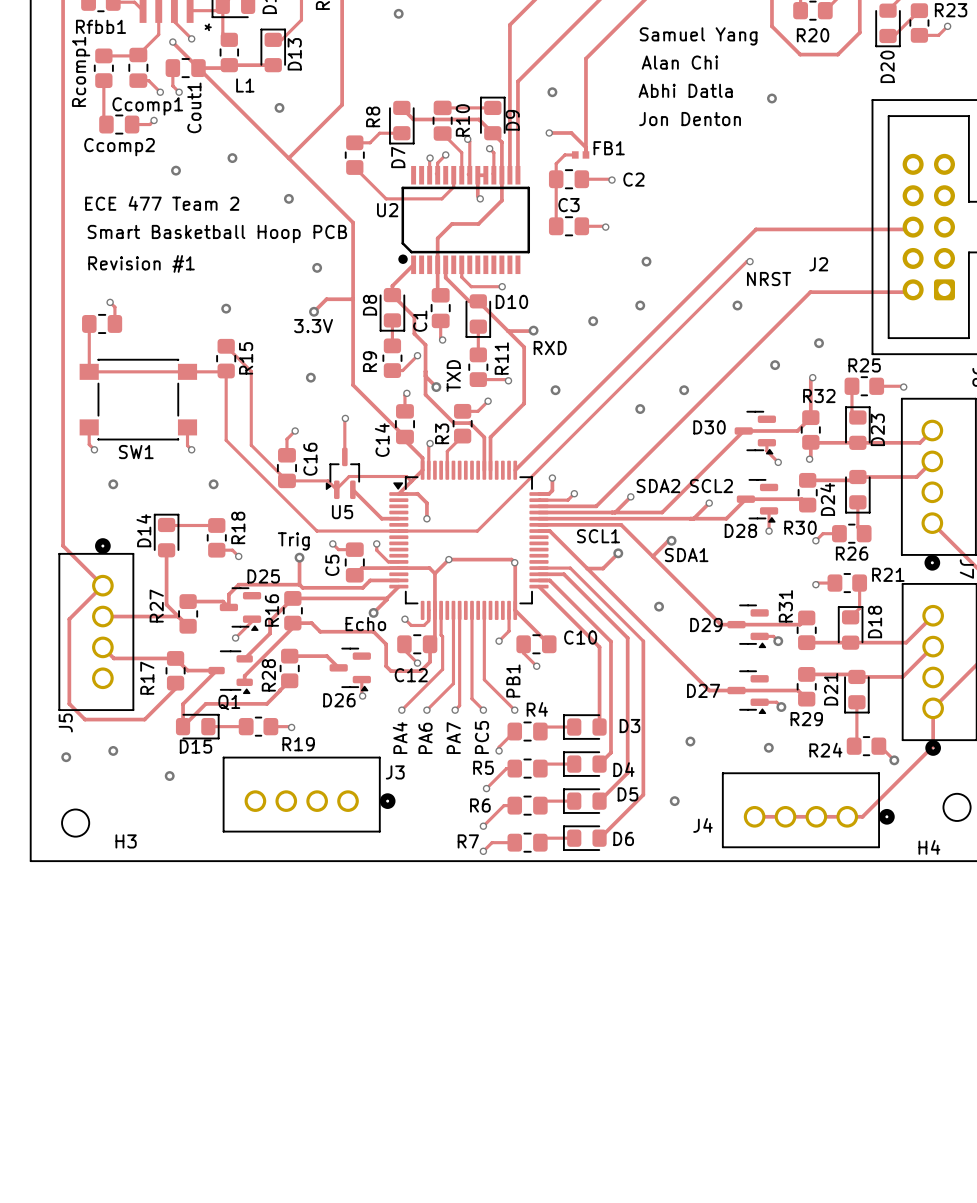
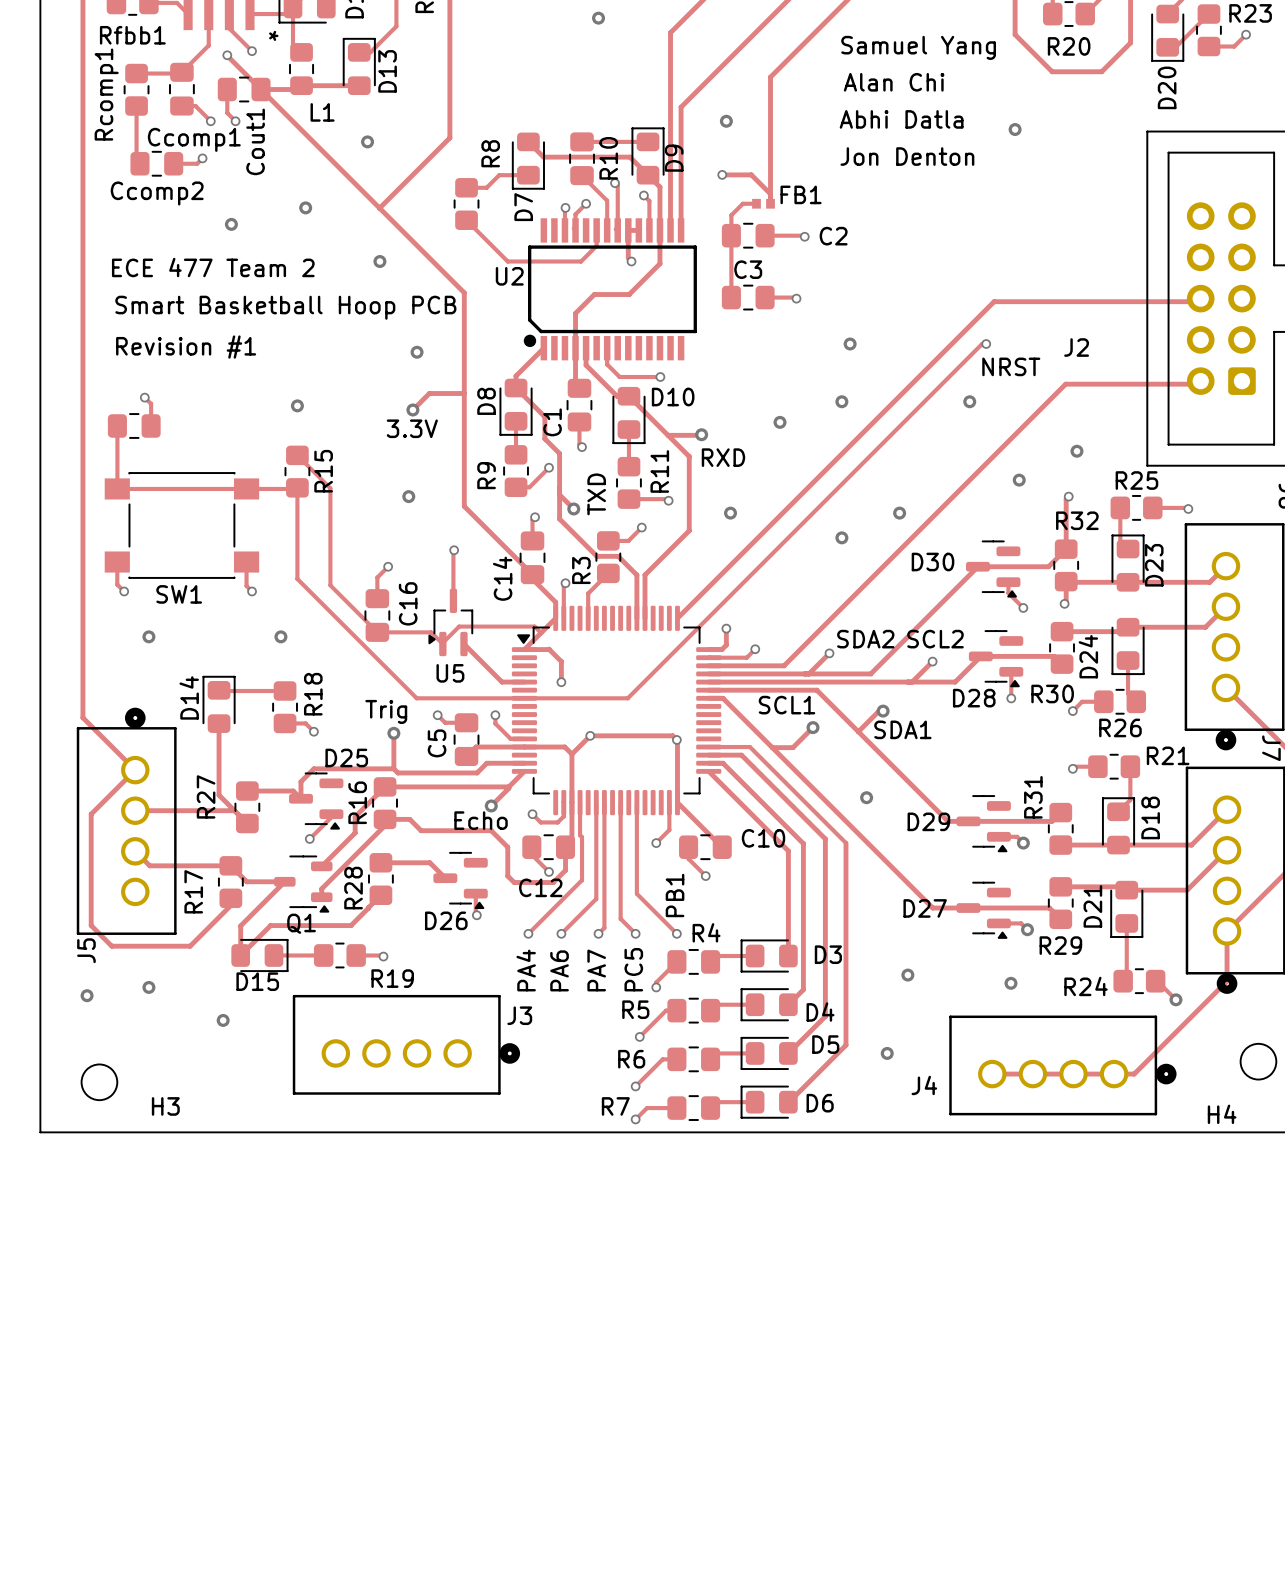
via: (398, 13) -> none
via: none -> (598, 18)

